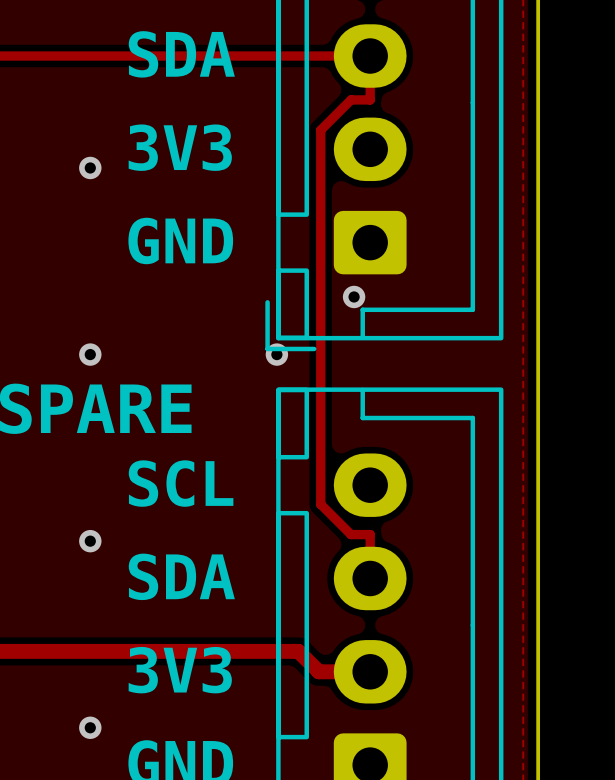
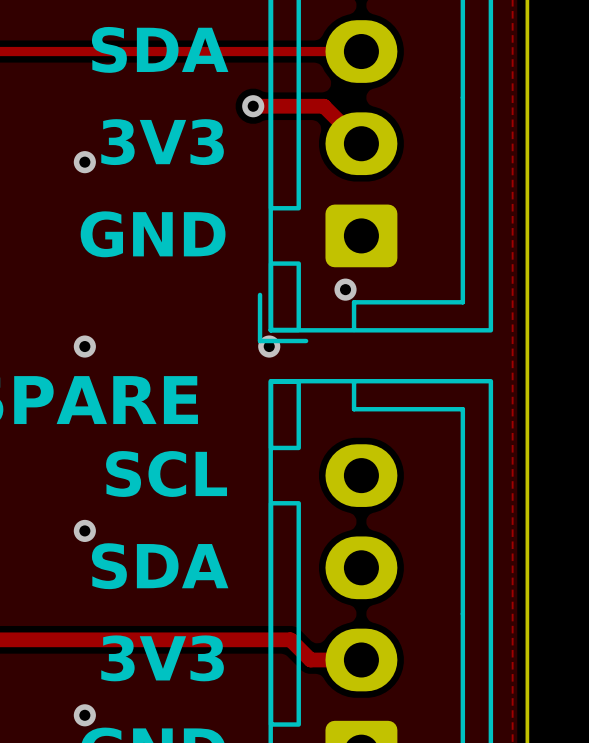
track: (370, 56) (370, 99) (350, 99) (320, 130) (320, 504) (350, 534) (370, 534) (370, 578) -> none
track: none -> (253, 106) (323, 106) (361, 143)
via: none -> (253, 106)

